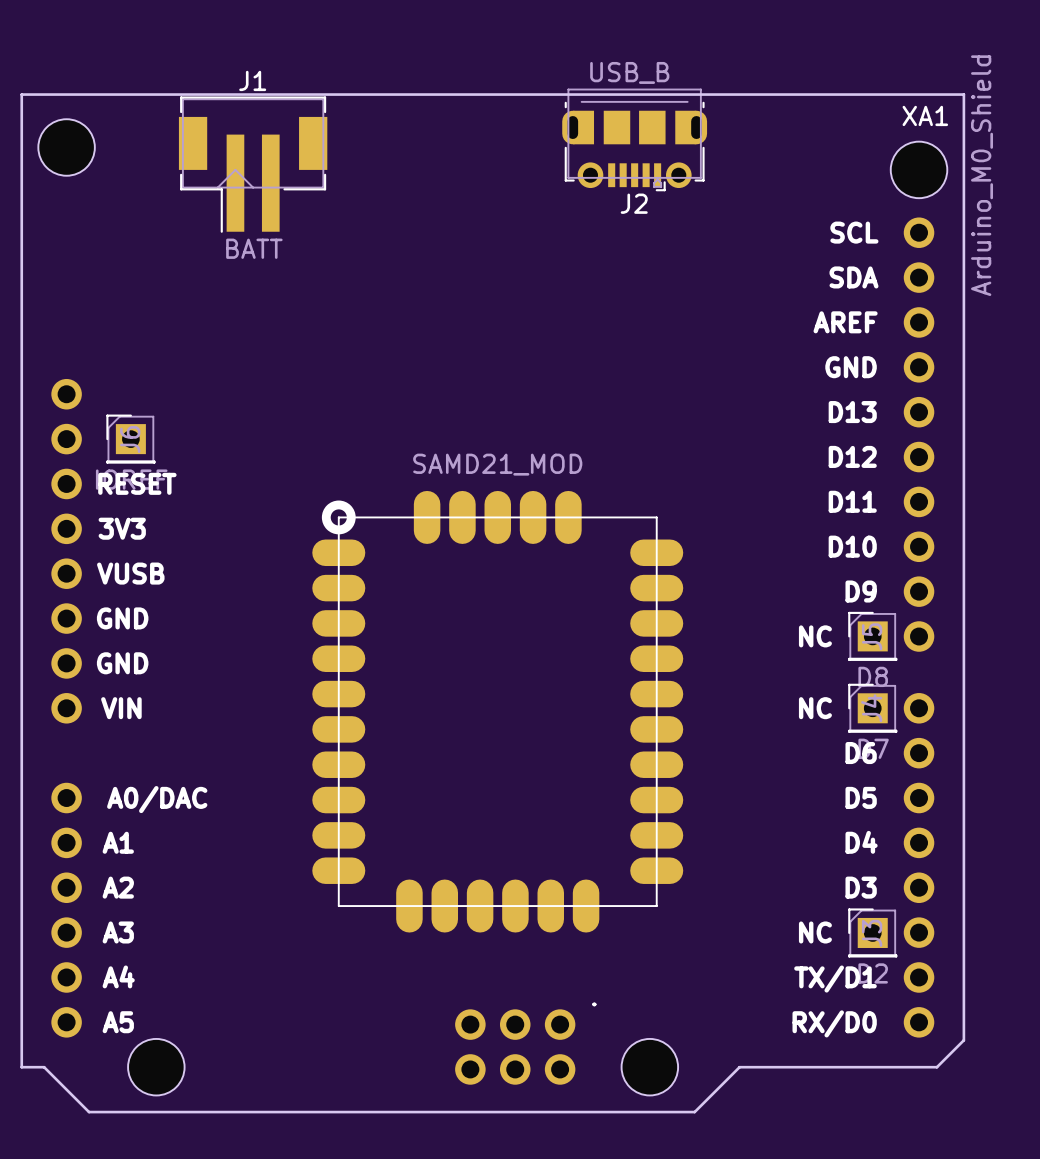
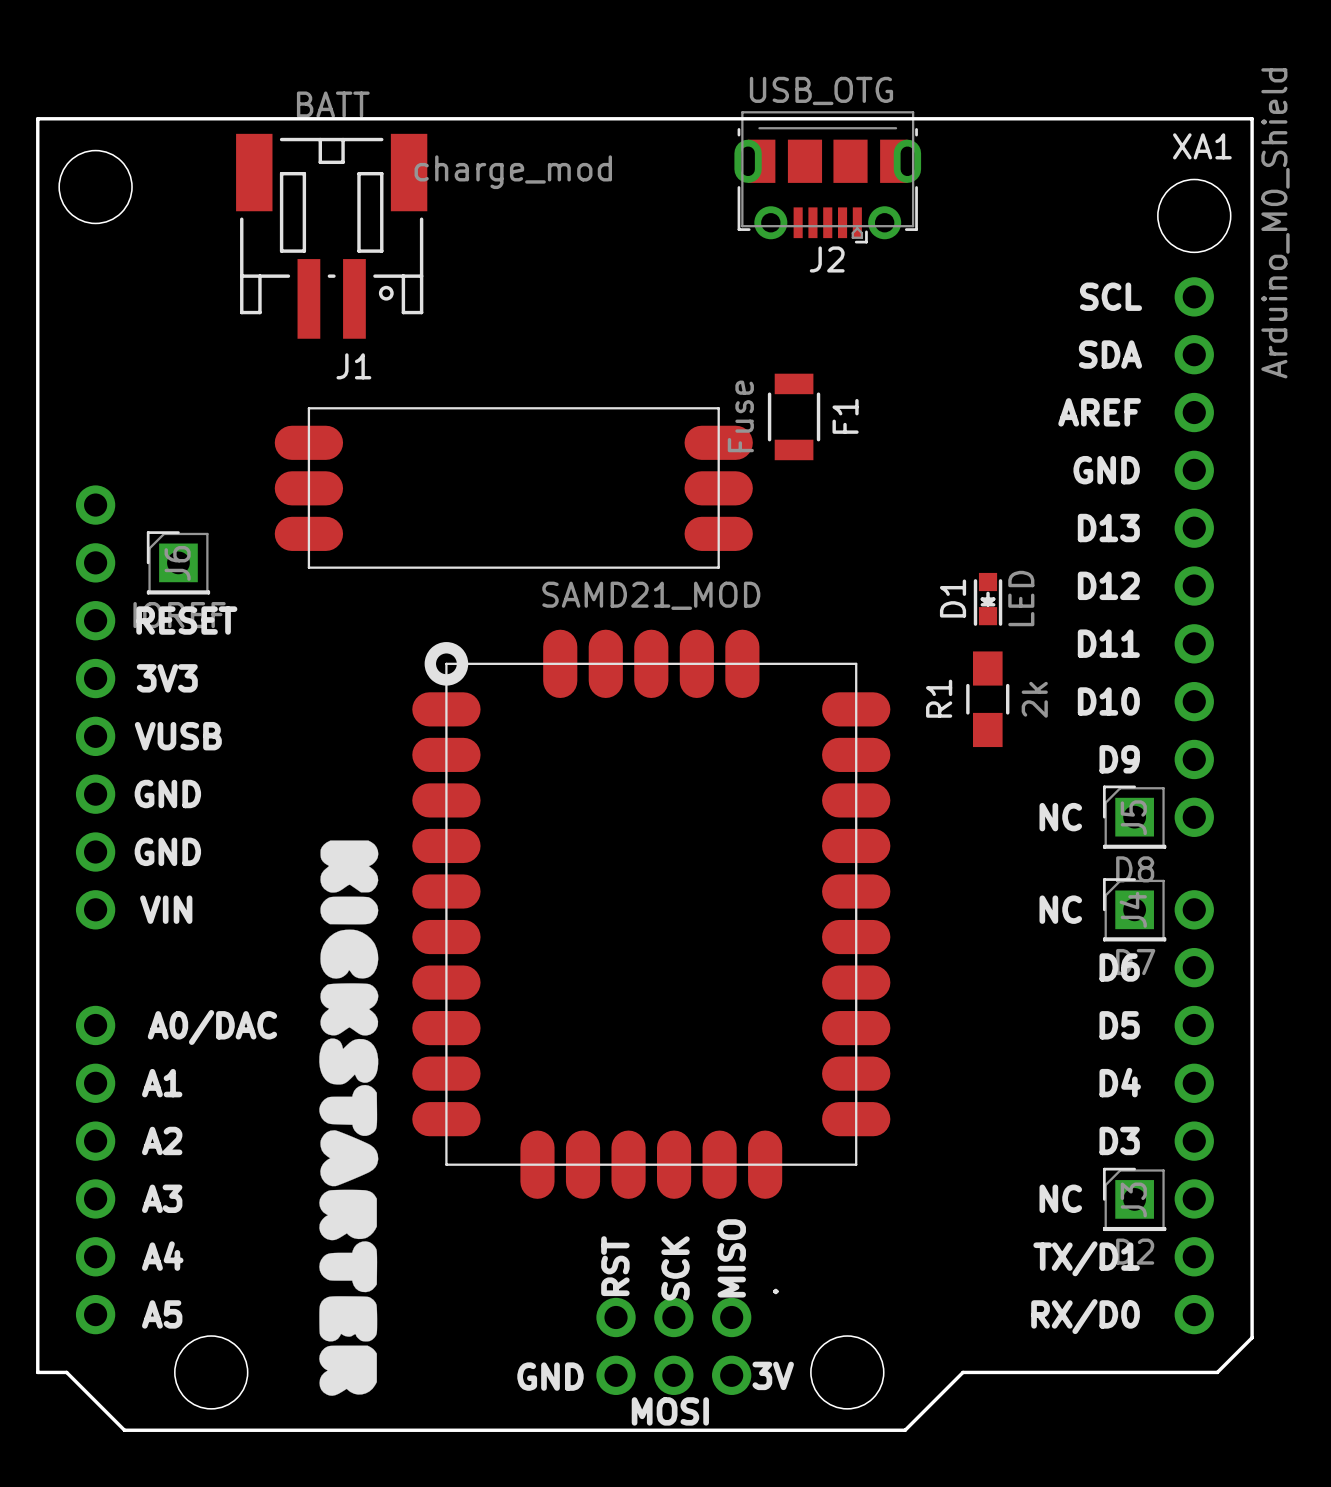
J2 value: USB_B (629, 72) -> USB_OTG (821, 90)
J1 name position: J1 (252, 80) -> J1 (353, 366)
J1 footprint: [178, 96, 328, 233] -> [236, 133, 428, 339]
J1 value position: BATT (254, 248) -> BATT (333, 104)
F1: none -> Fuse (794, 416)
part: none -> charge_mod (513, 487)
D1: none -> LED (988, 599)
R1: none -> 2k (987, 699)
drawing: none -> [319, 840, 379, 1396]
text: none -> MISO (731, 1258)
text: none -> RST (615, 1266)
text: none -> SCK (675, 1268)
text: none -> 3V (773, 1375)
text: none -> GND (550, 1376)
text: none -> MOSI (670, 1411)

